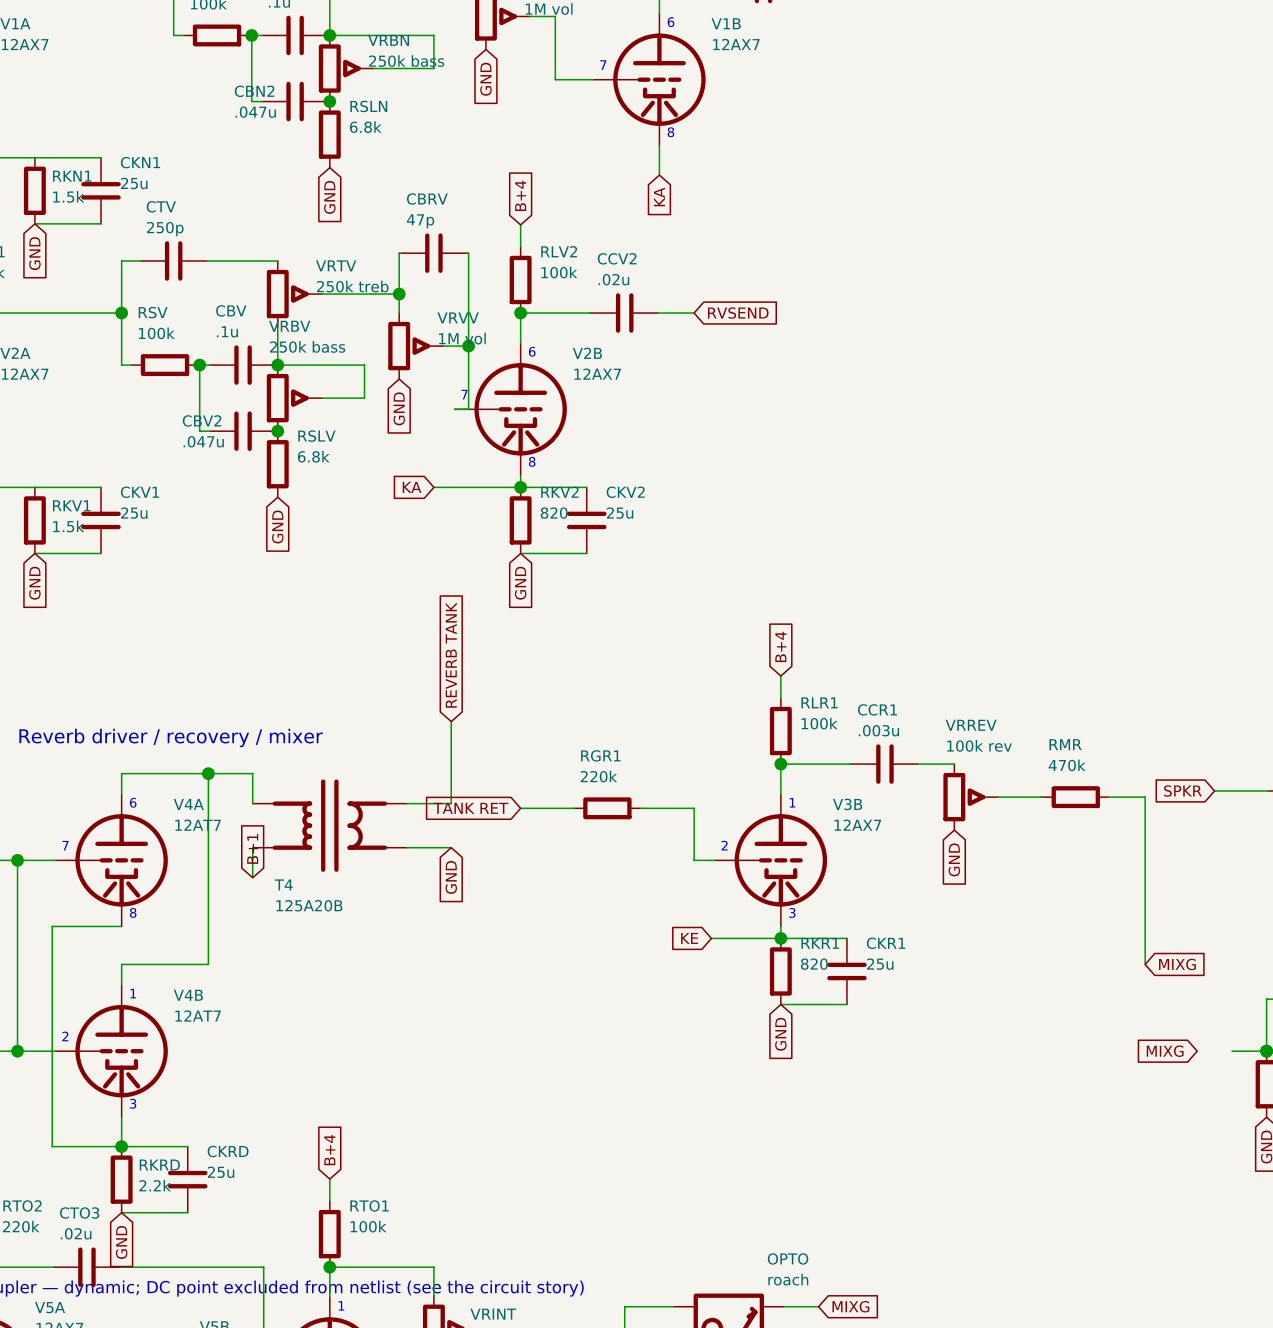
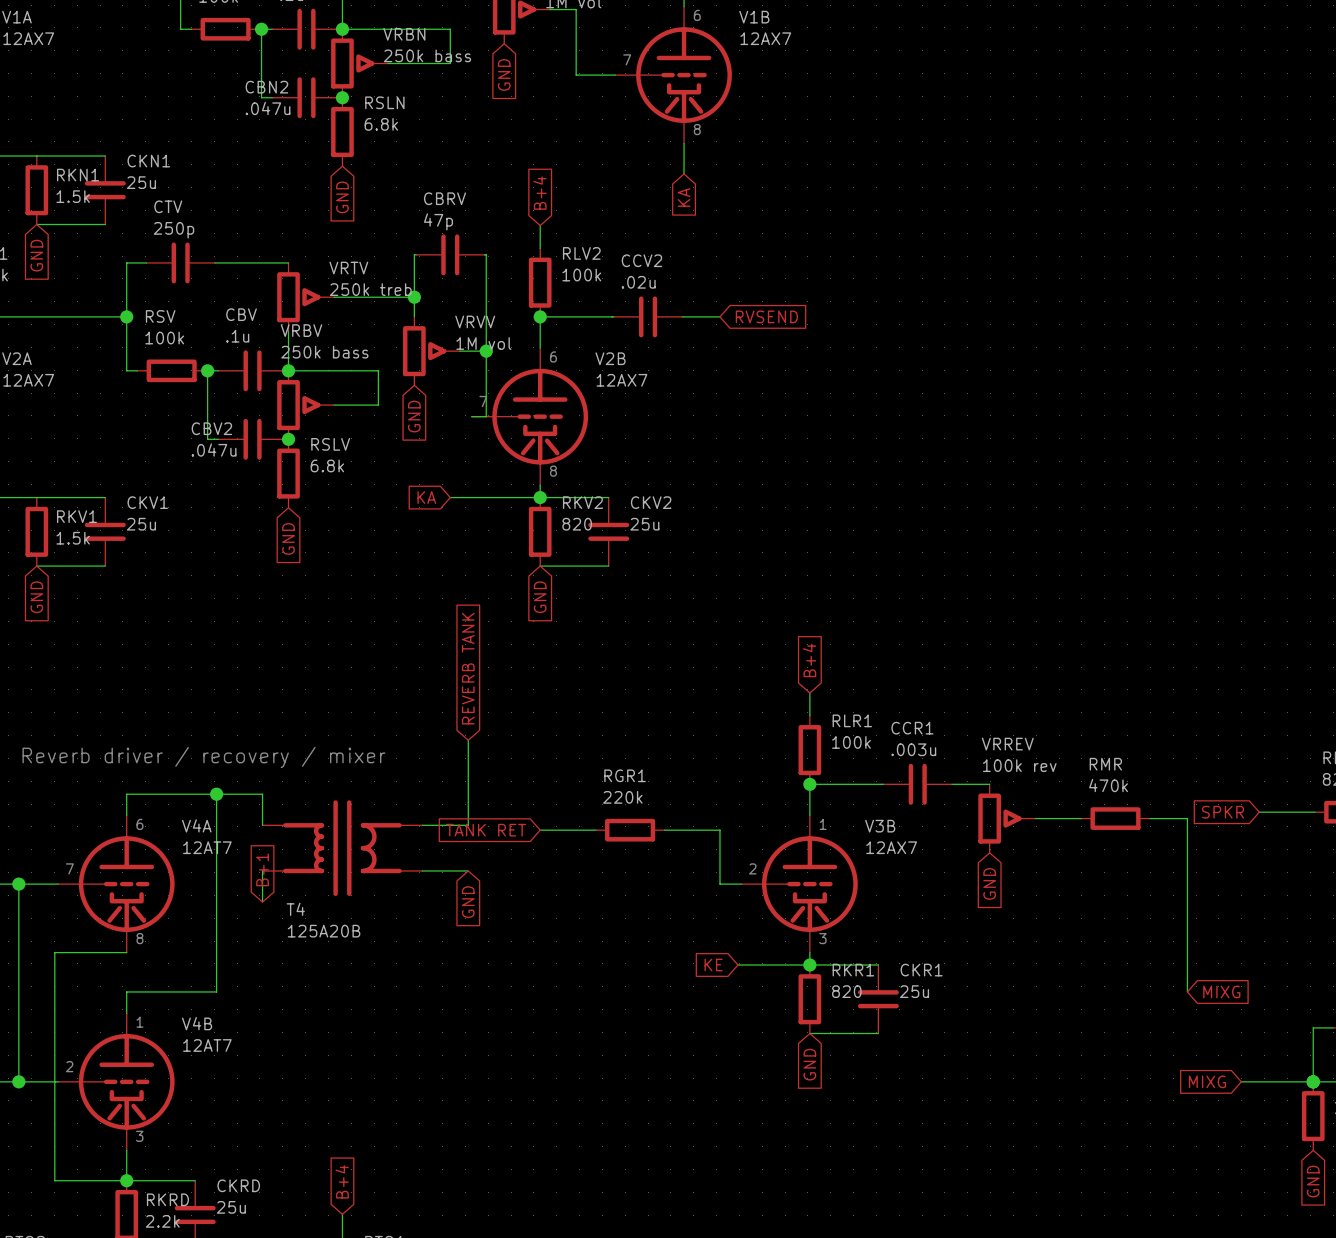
wire: none -> (1241, 1081) (1277, 1081)

